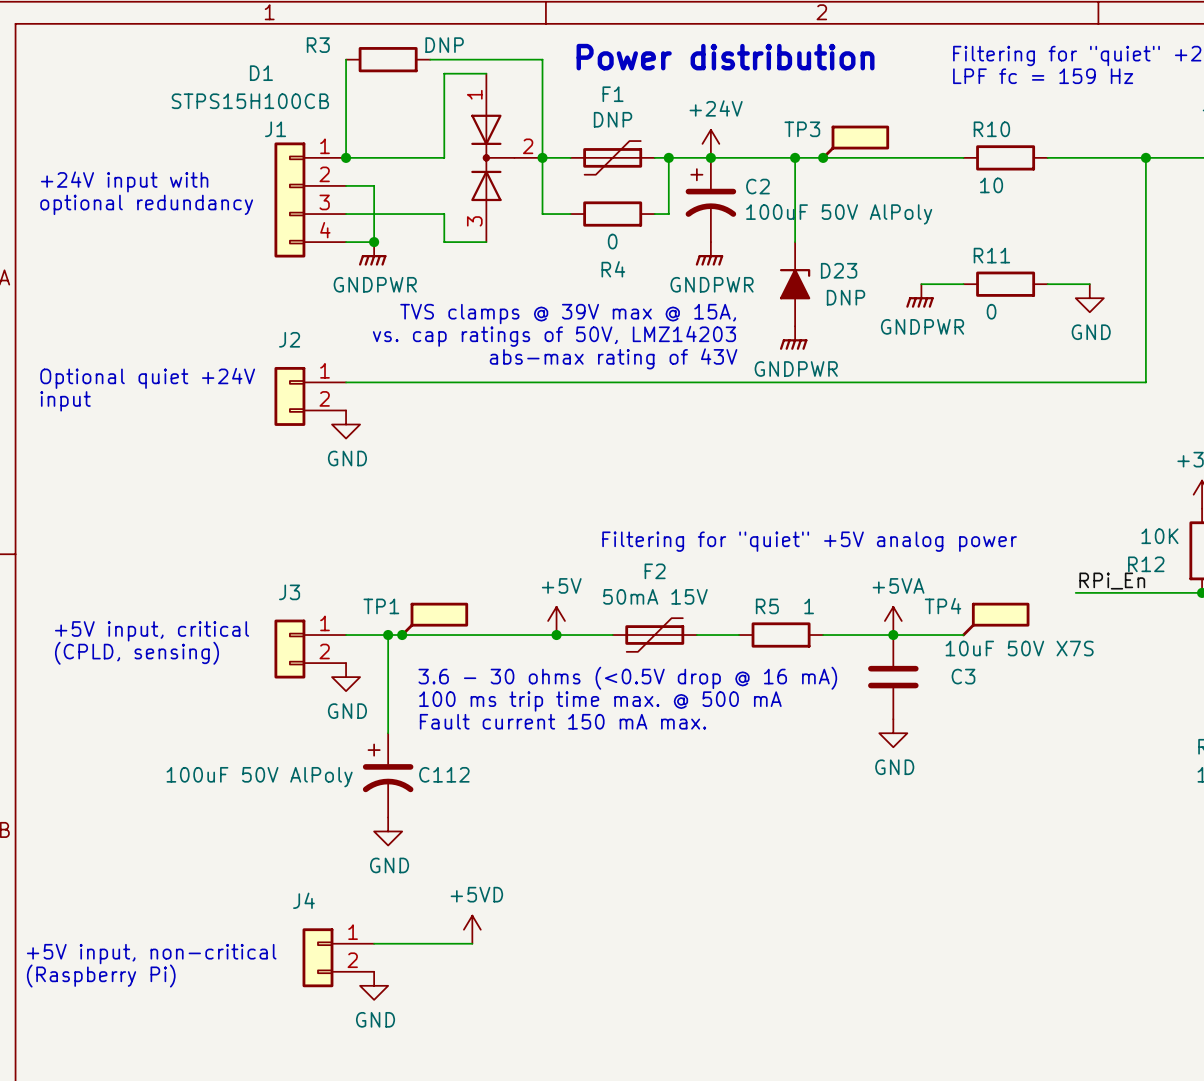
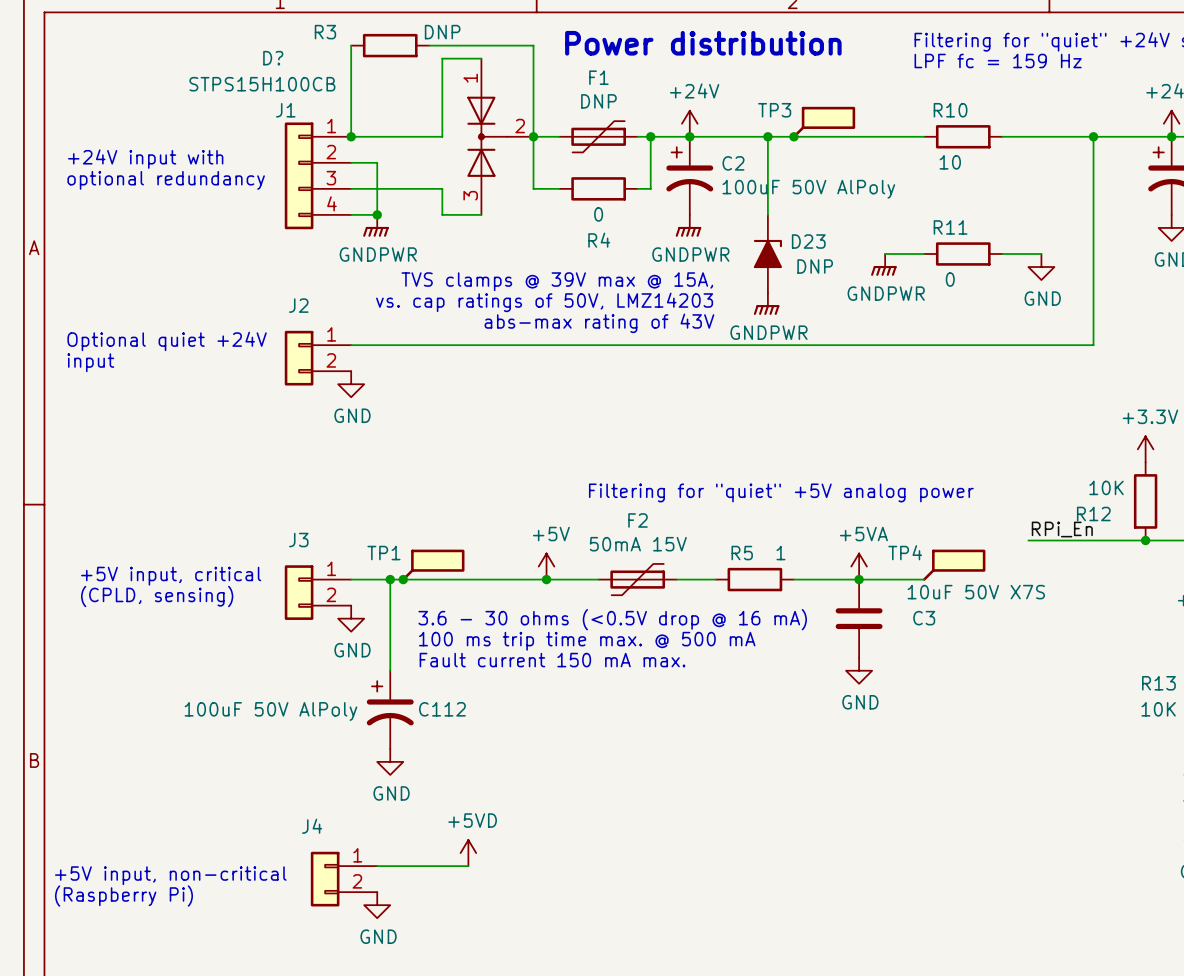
D1 name: D1 (261, 73) -> D? (273, 58)

